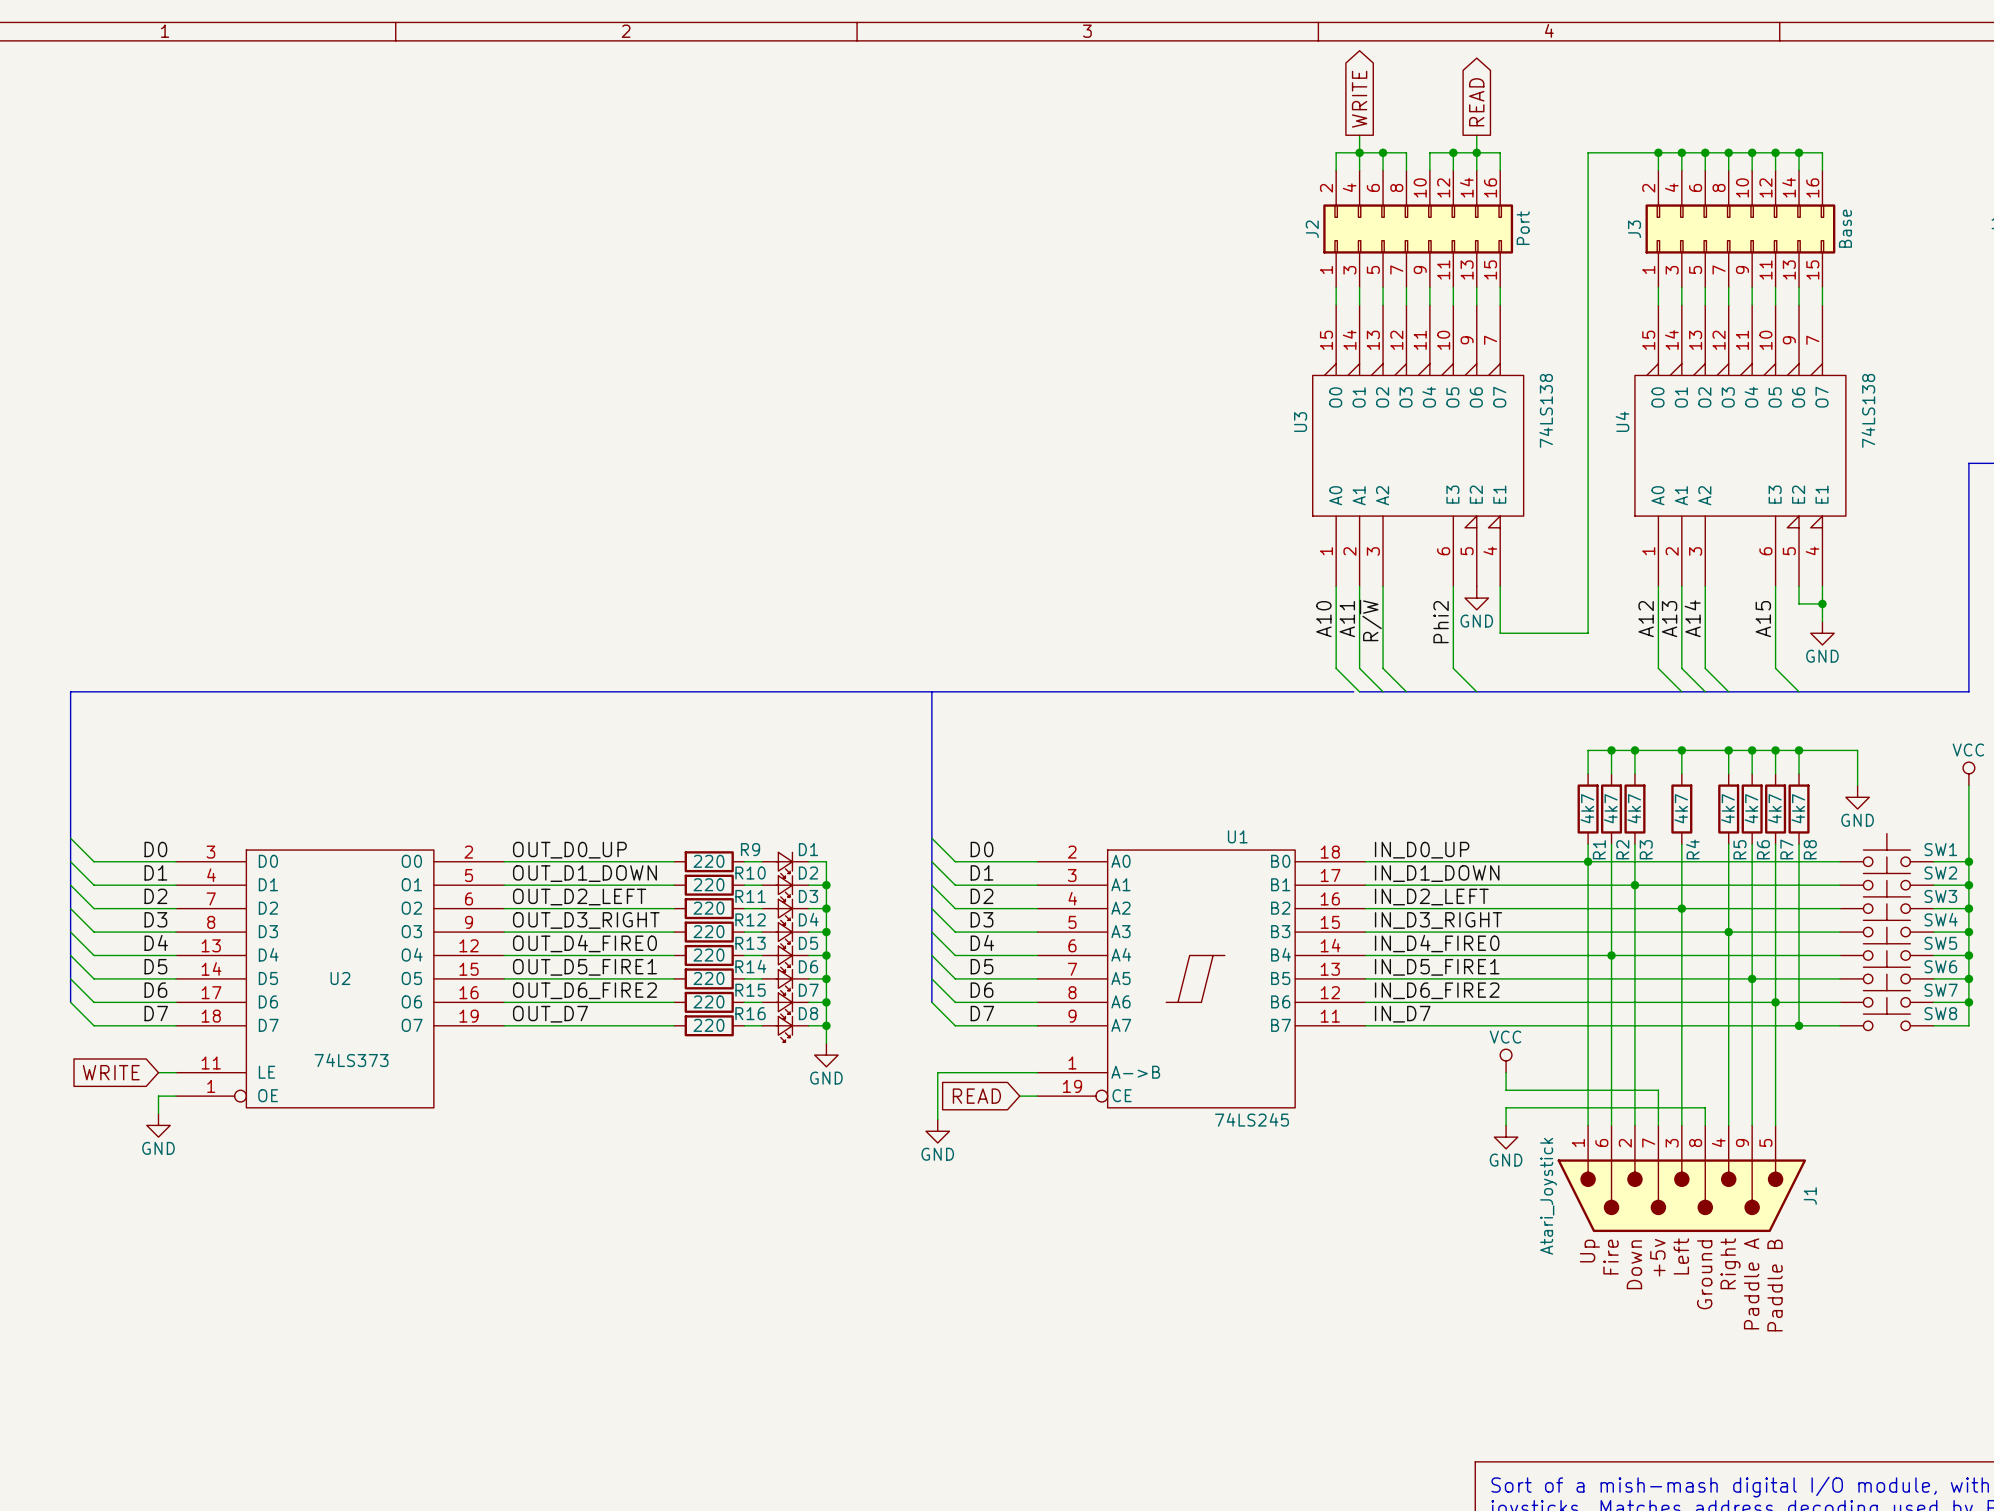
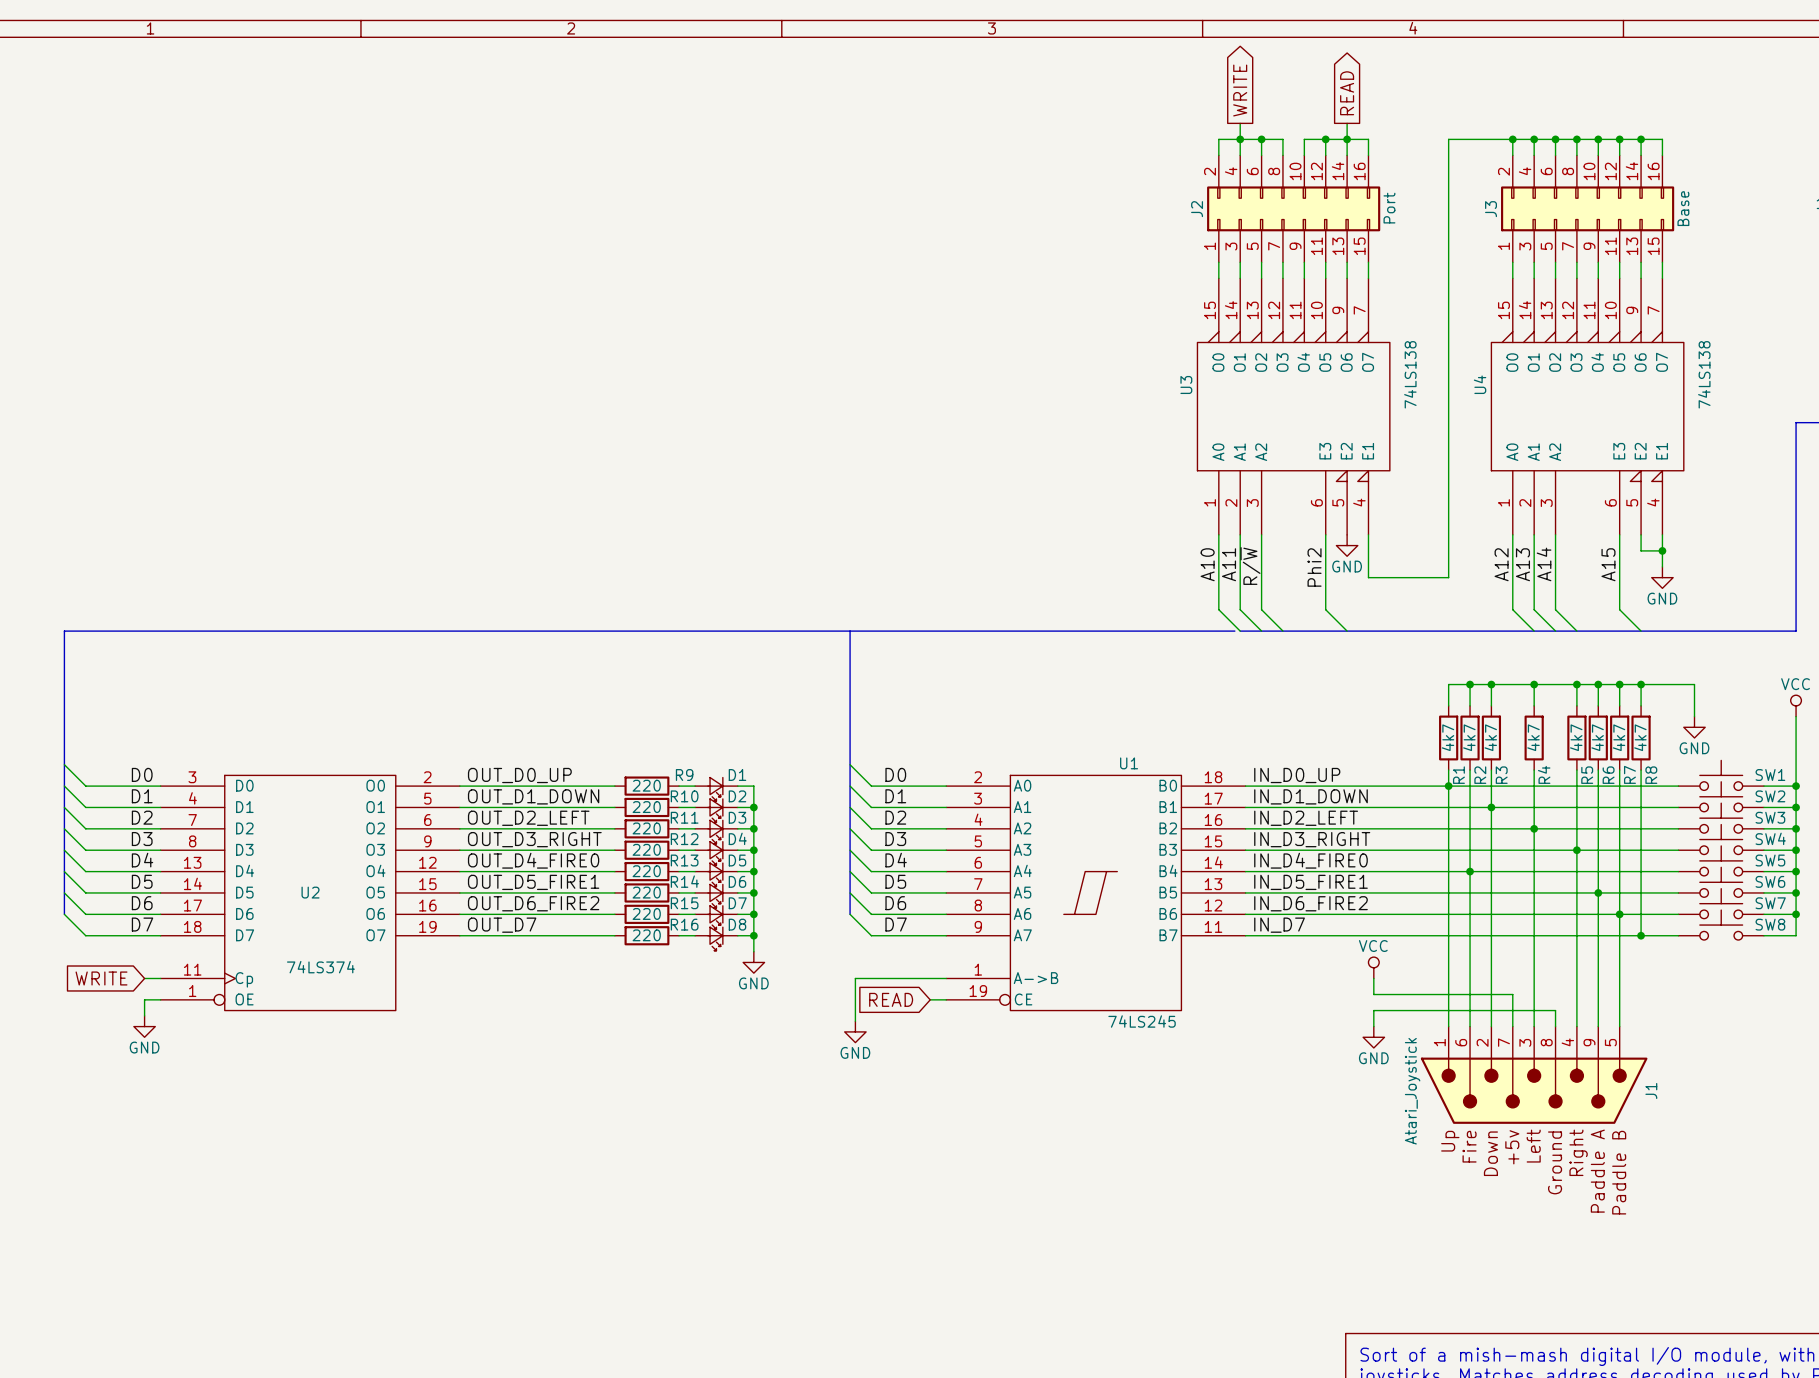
U2 symbol: [176, 850, 505, 1108] -> [160, 775, 460, 1011]
U2 value: 74LS373 (351, 1060) -> 74LS374 (320, 967)

